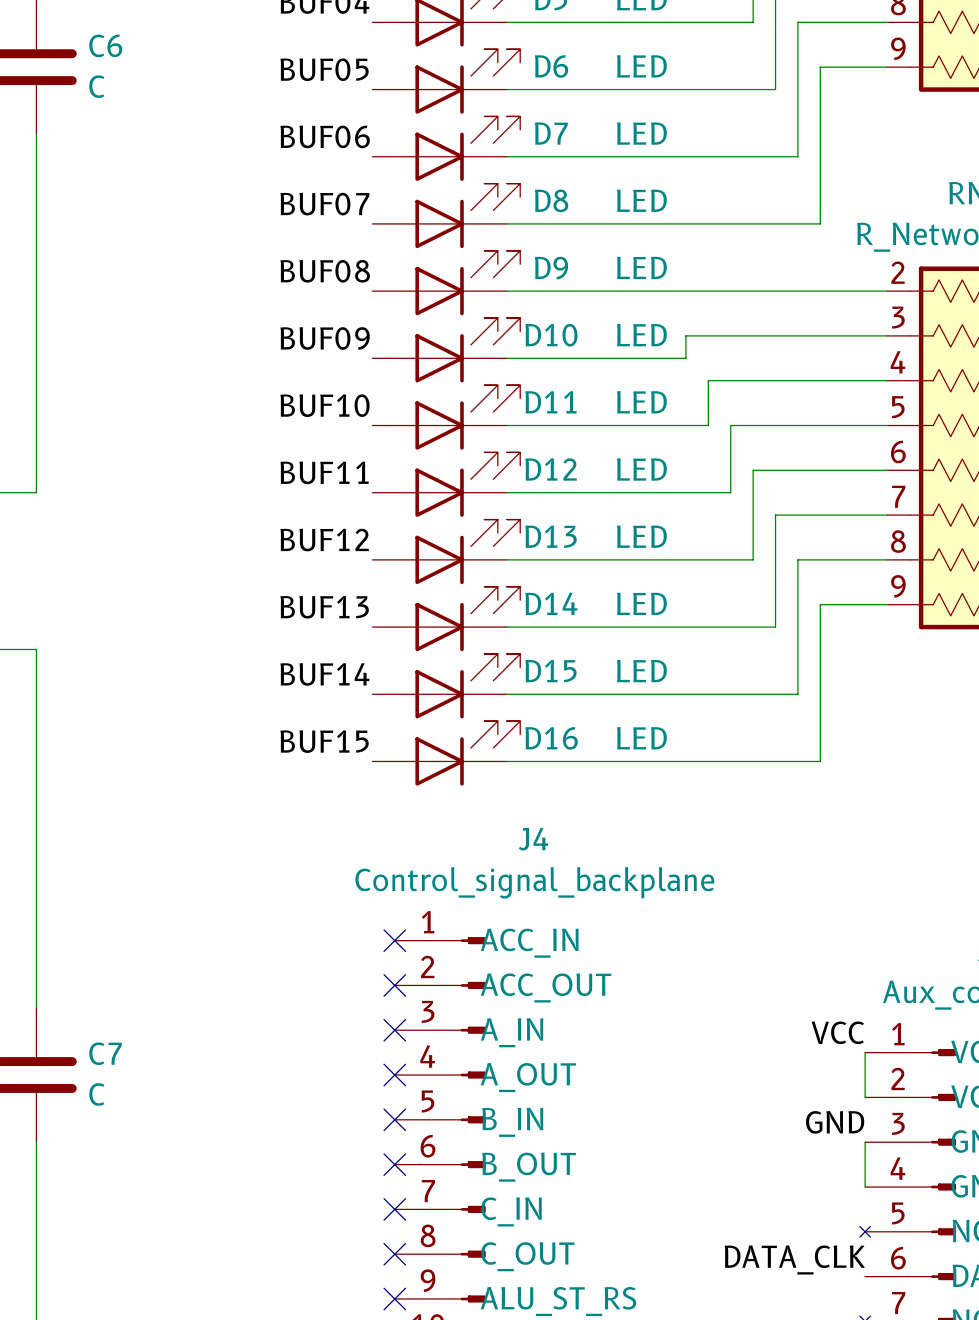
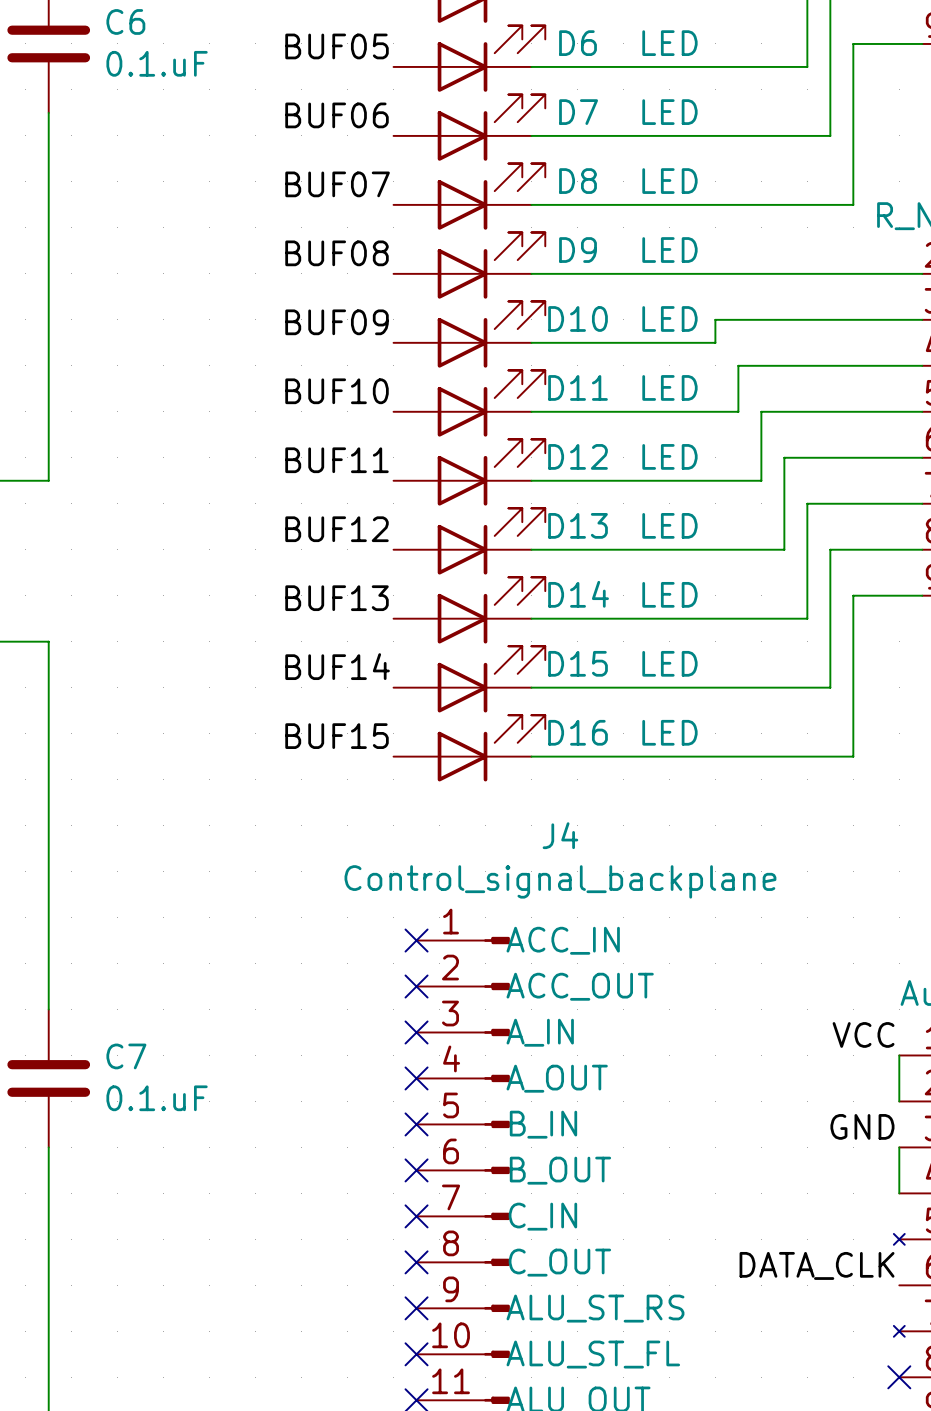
C6 value: C (96, 86) -> 0.1.uF (157, 63)
C7 value: C (96, 1094) -> 0.1.uF (157, 1098)

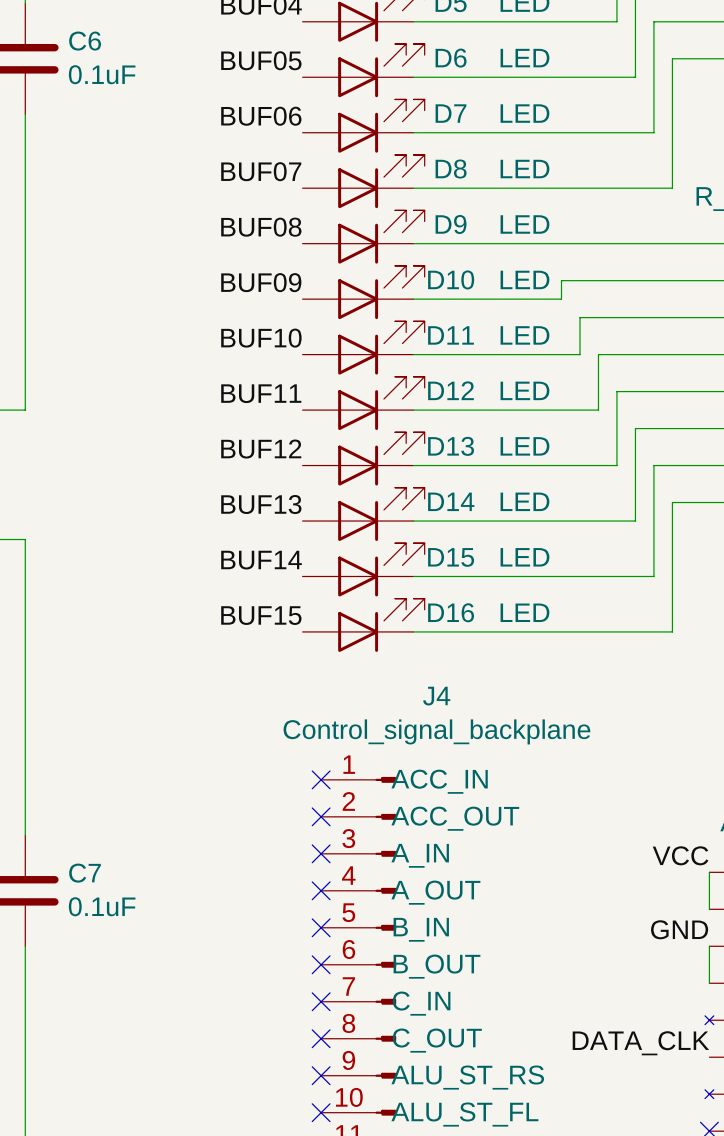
C6 value: 0.1.uF (157, 63) -> 0.1uF (102, 74)
C7 value: 0.1.uF (157, 1098) -> 0.1uF (102, 906)

